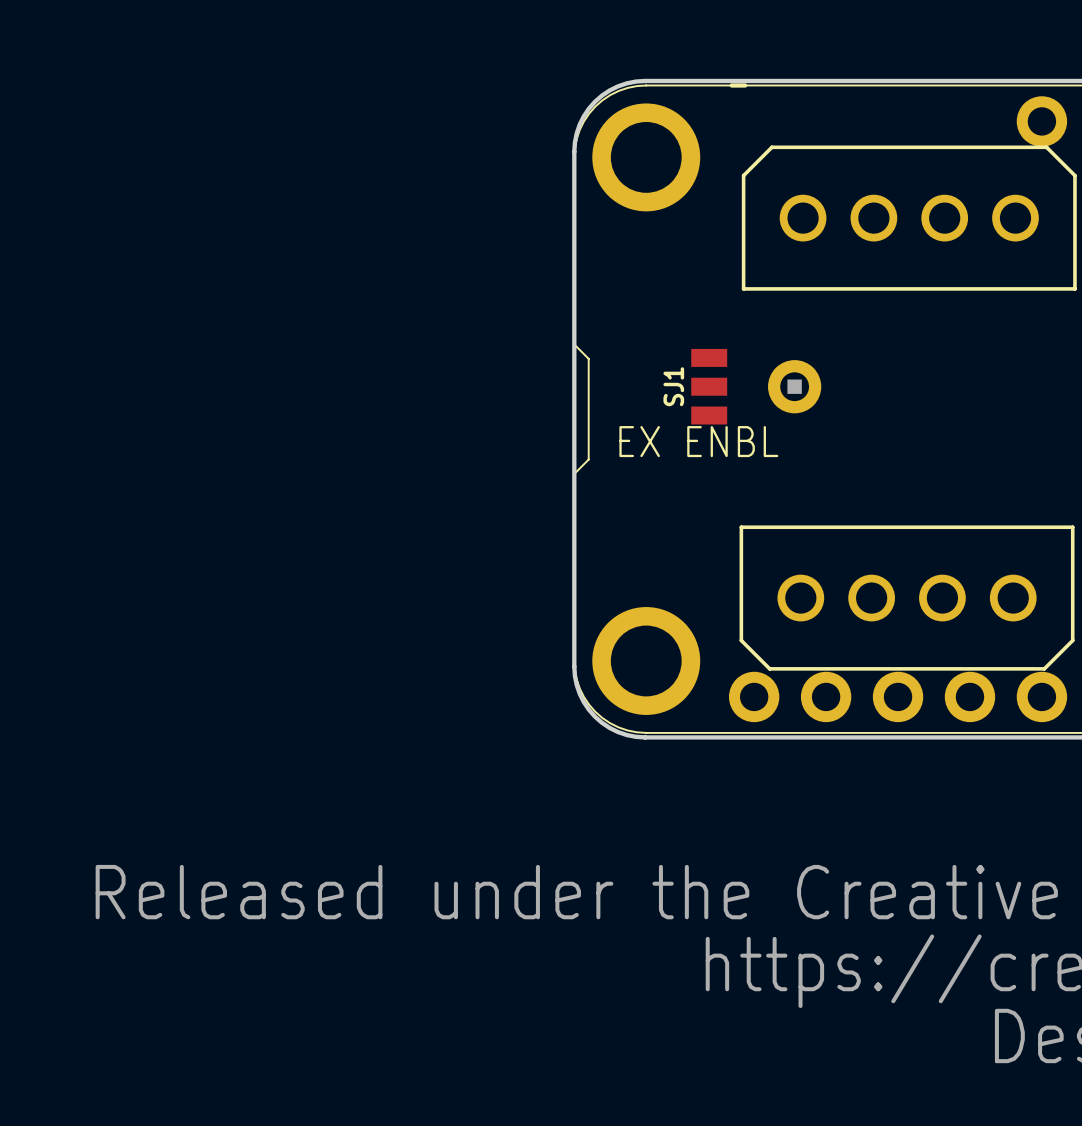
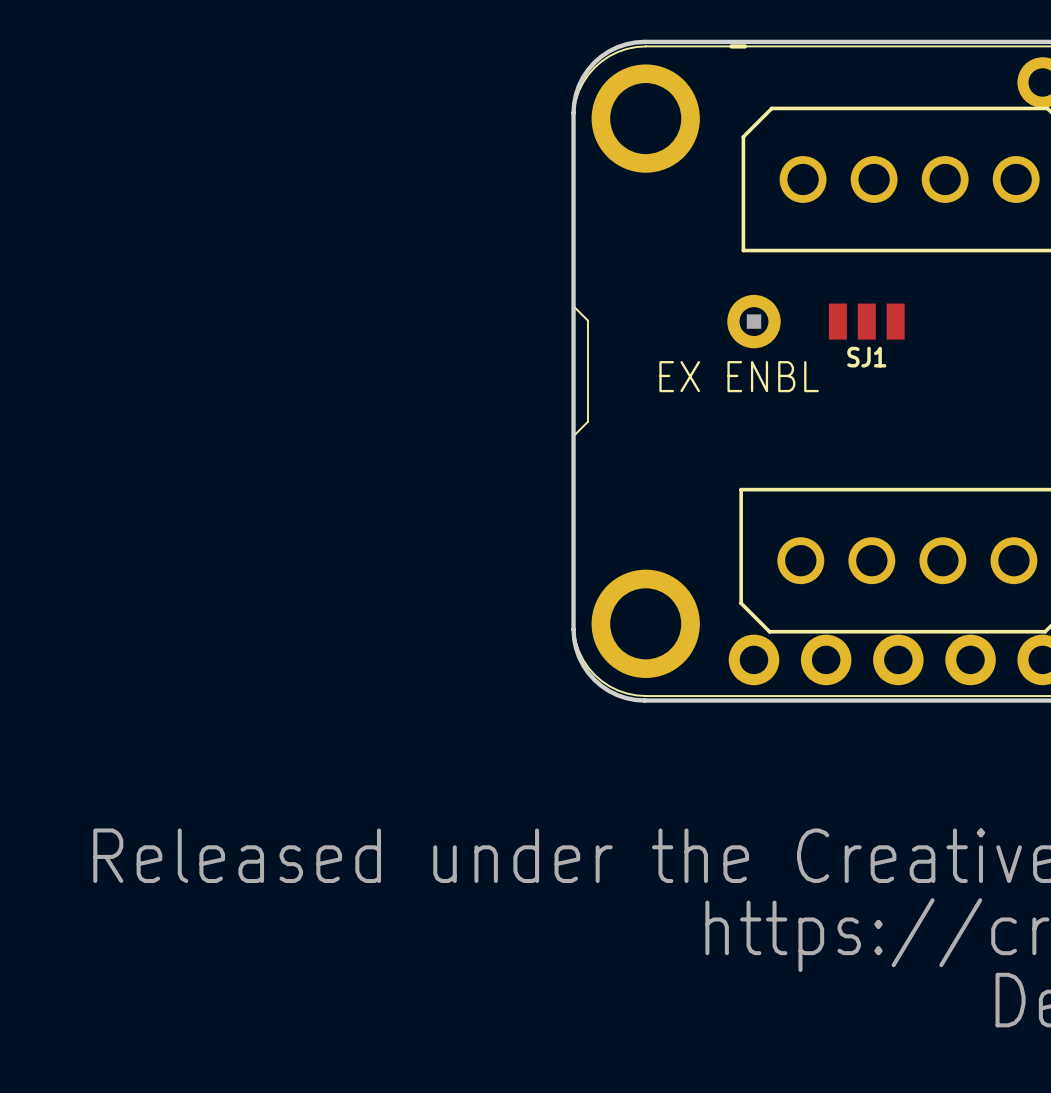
SJ1 rotation: 0° (709, 386) -> 90° clockwise (866, 321)
SJ1 position: (709, 386) -> (866, 321)
part position: (794, 386) -> (753, 321)
text position: EX ENBL (698, 441) -> EX ENBL (739, 376)

